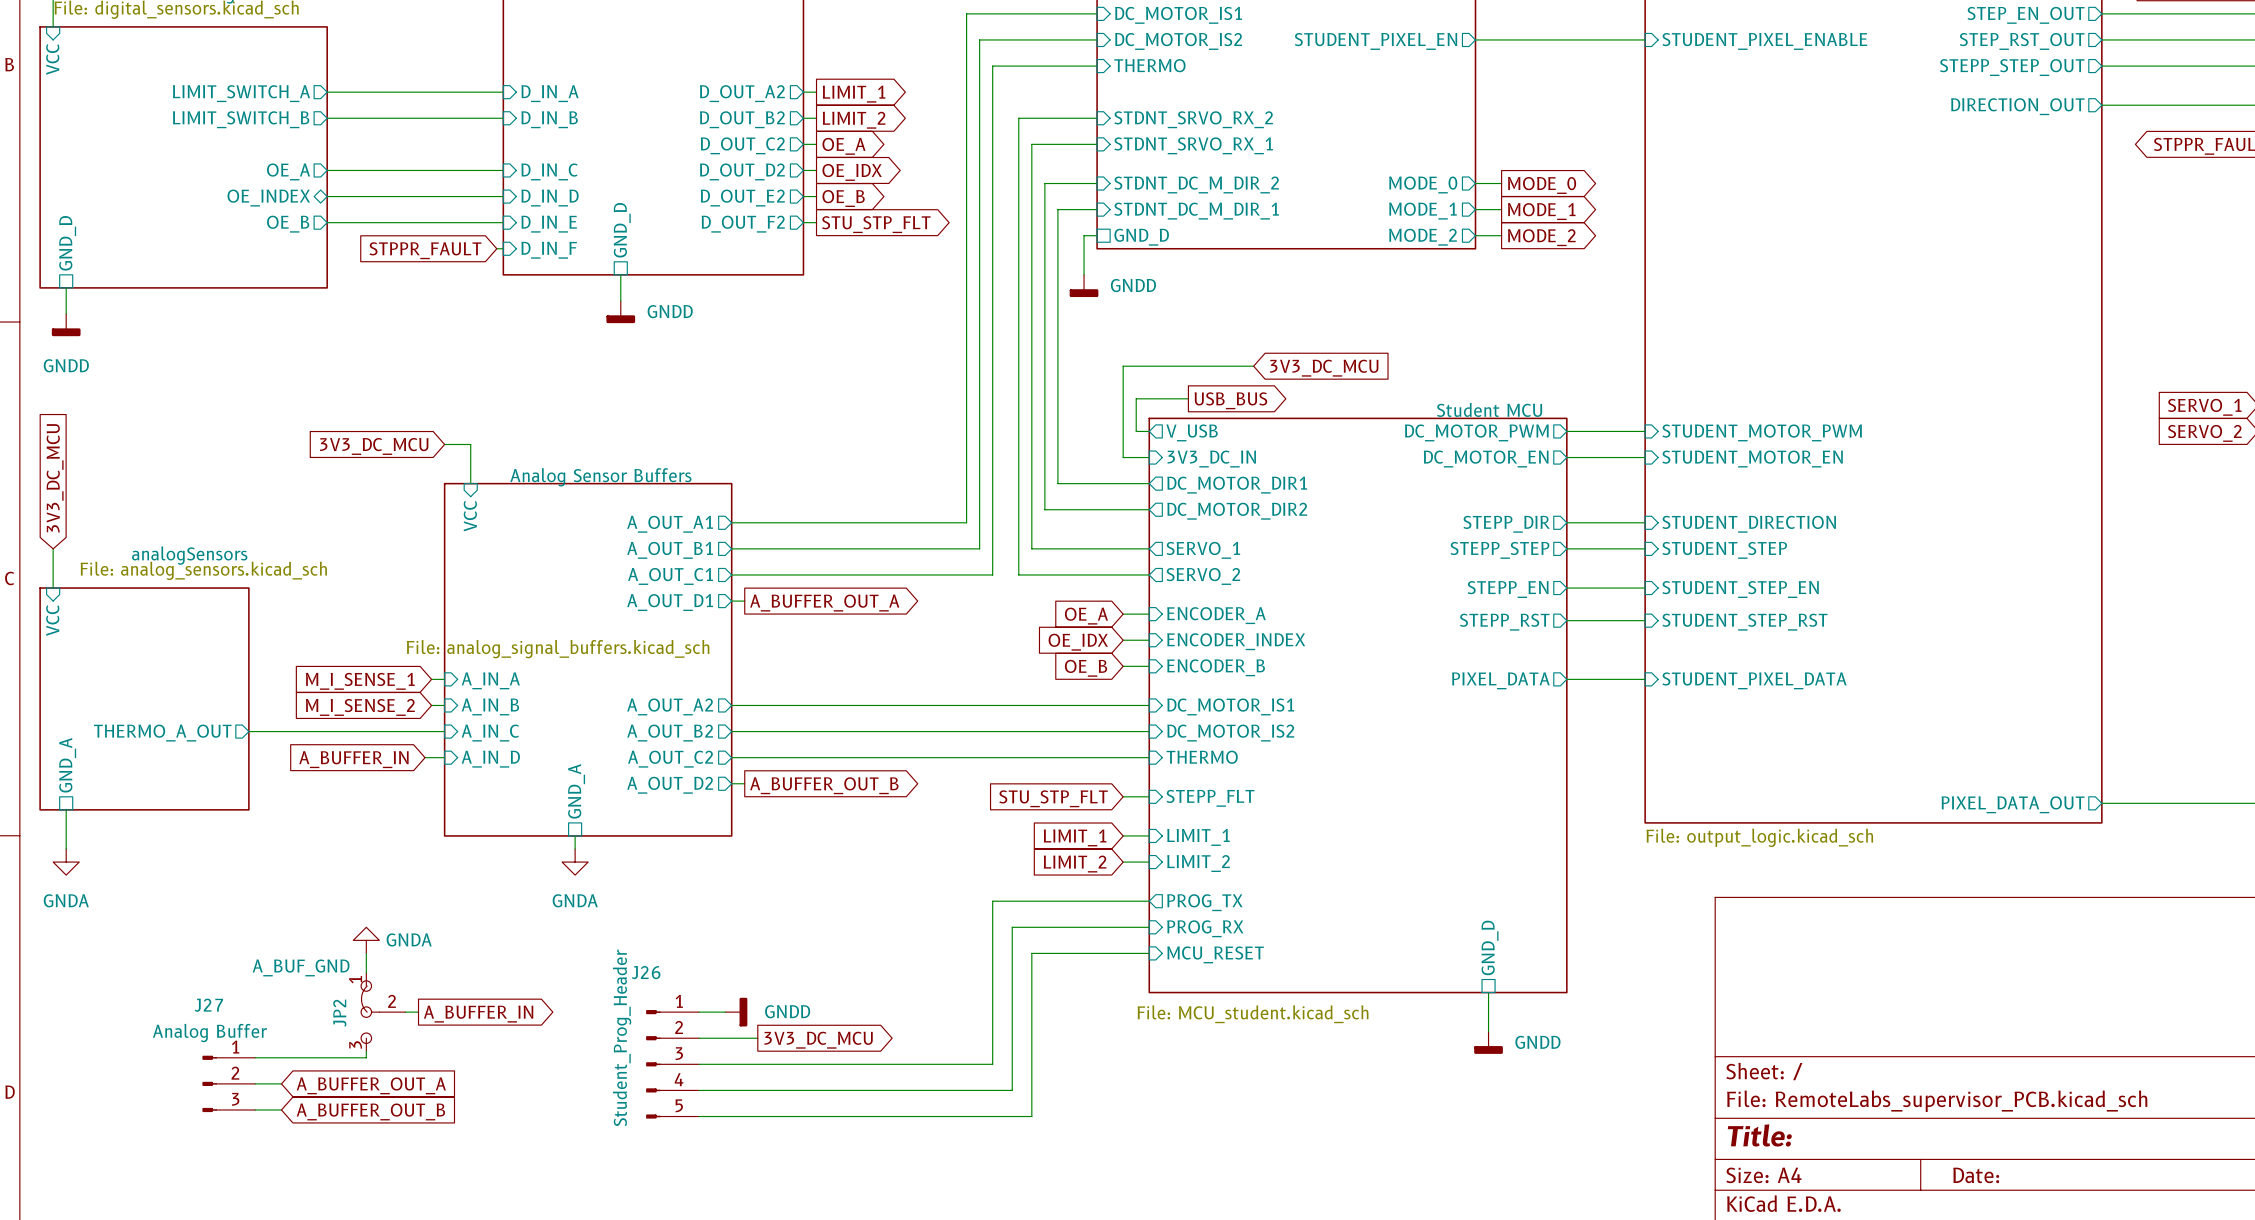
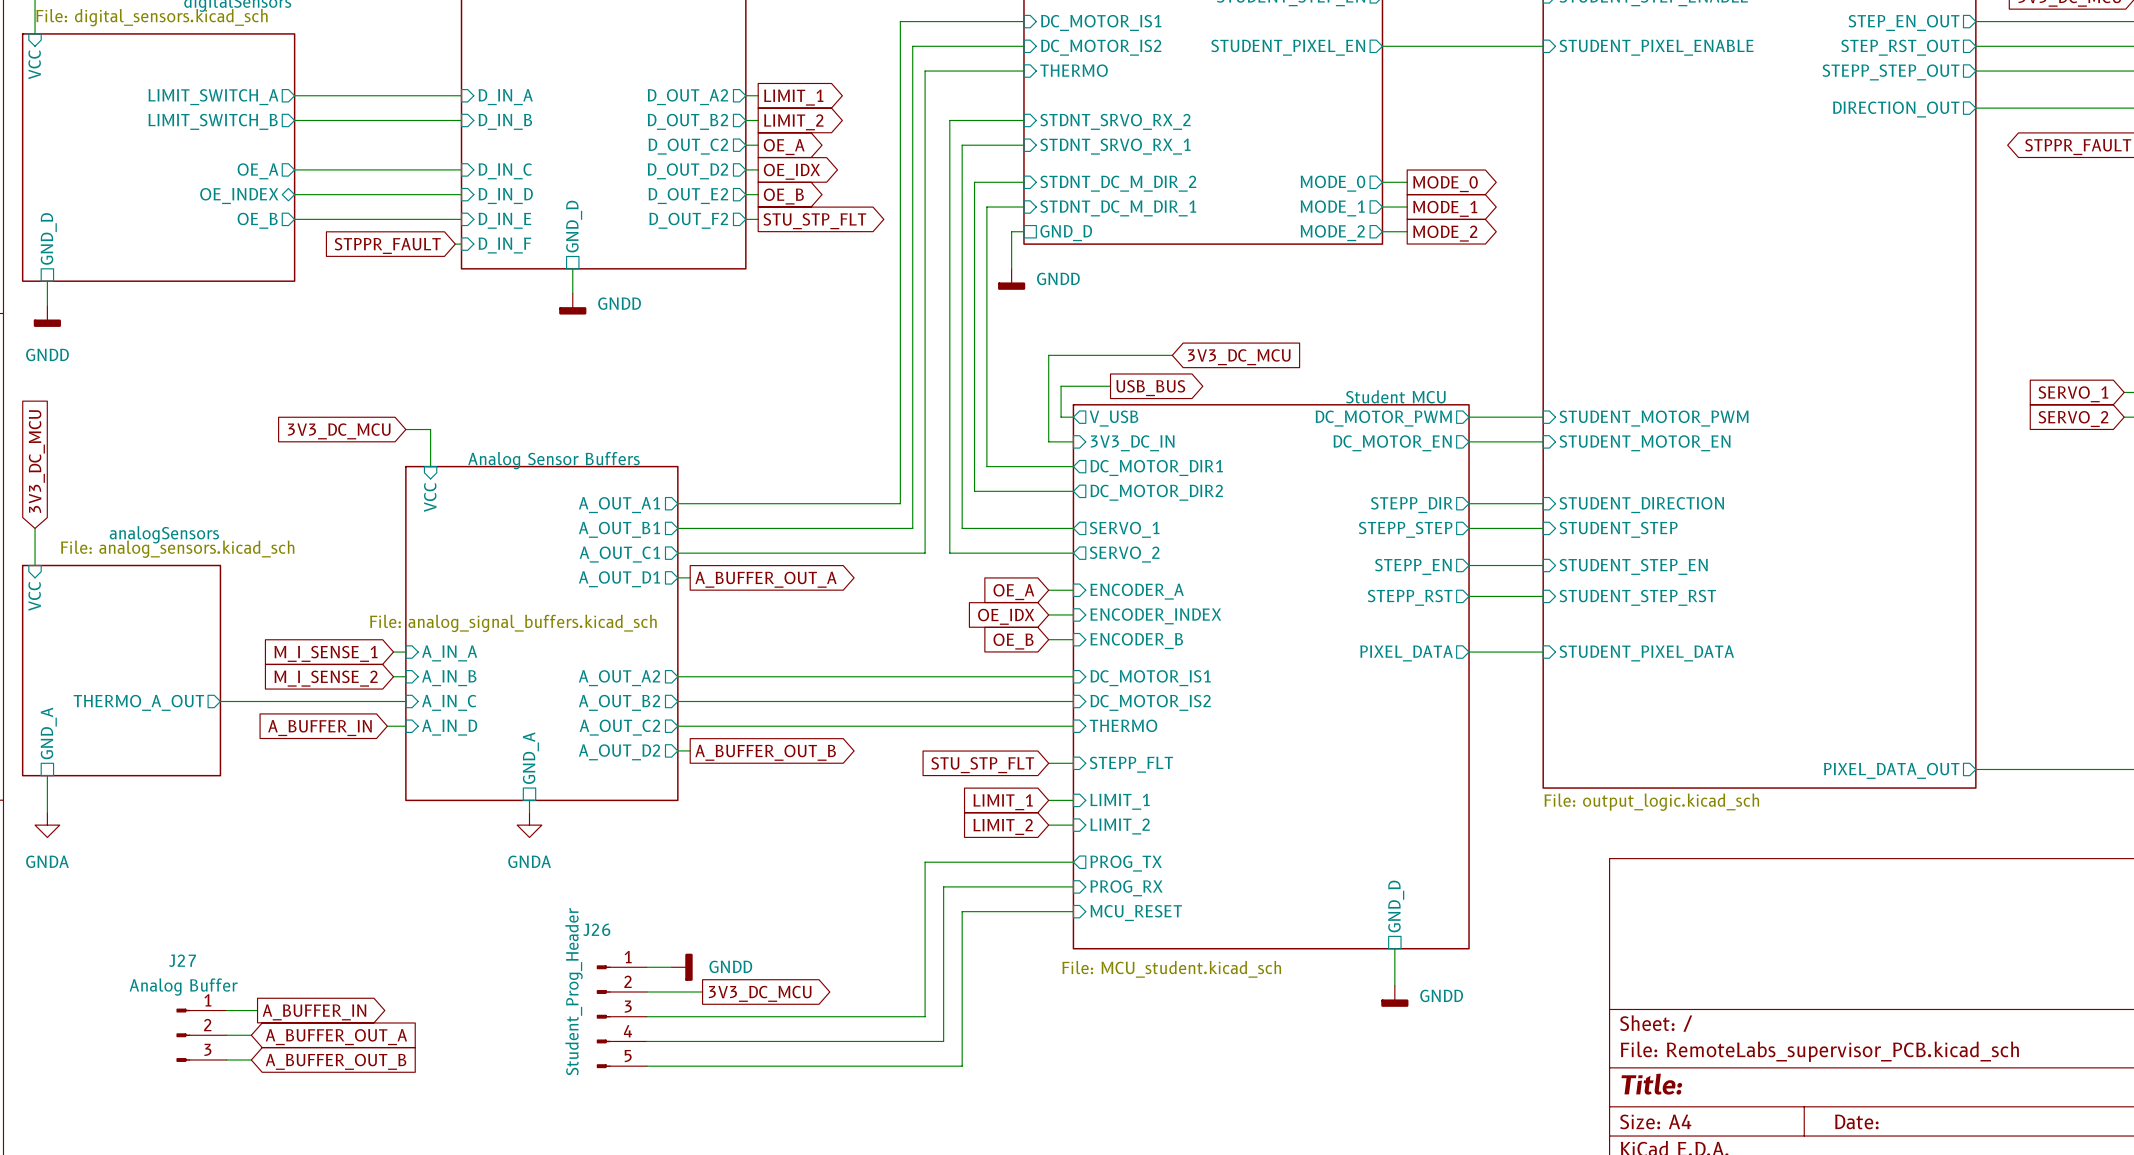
power symbol: GNDA (366, 940) -> none
wire: (366, 953) (366, 972) -> none
JP2: A_BUF_GND (383, 1012) -> none
wire: (405, 1012) (418, 1012) -> none
global label position: A_BUFFER_IN (478, 1014) -> A_BUFFER_IN (314, 1012)
wire: (366, 1051) (366, 1057) (288, 1057) -> none

